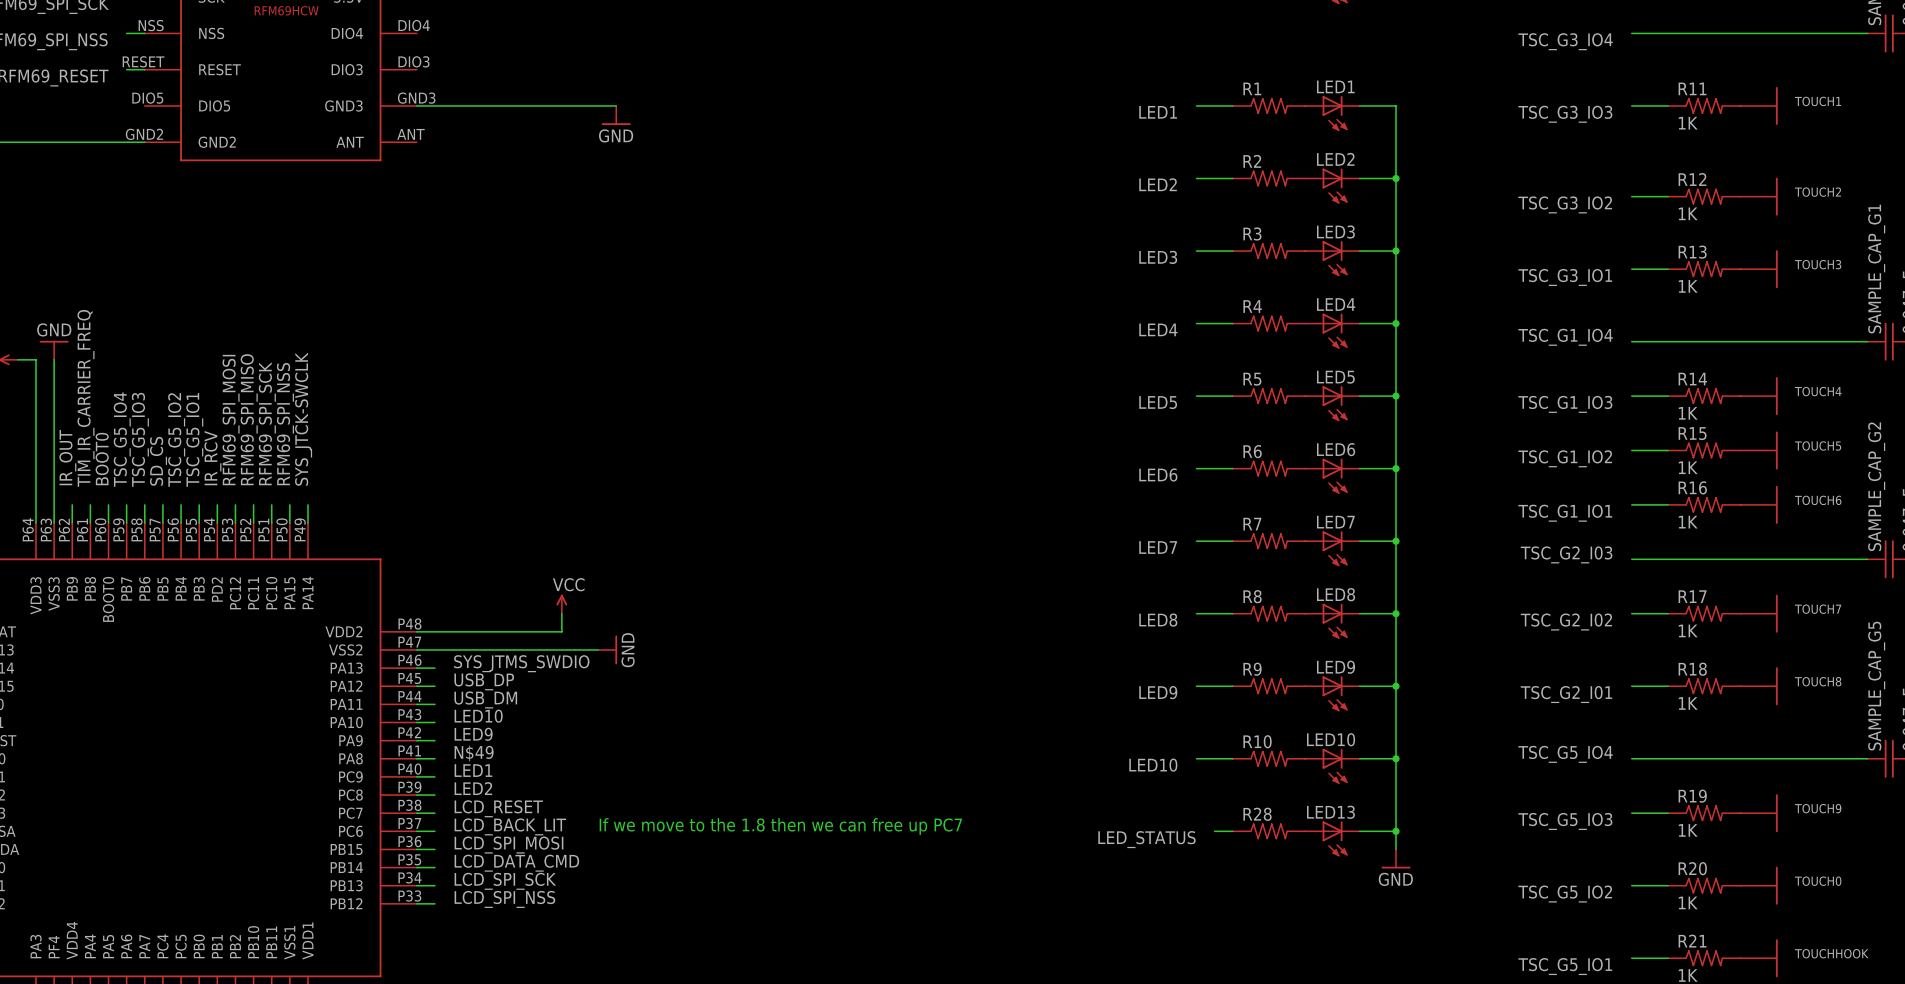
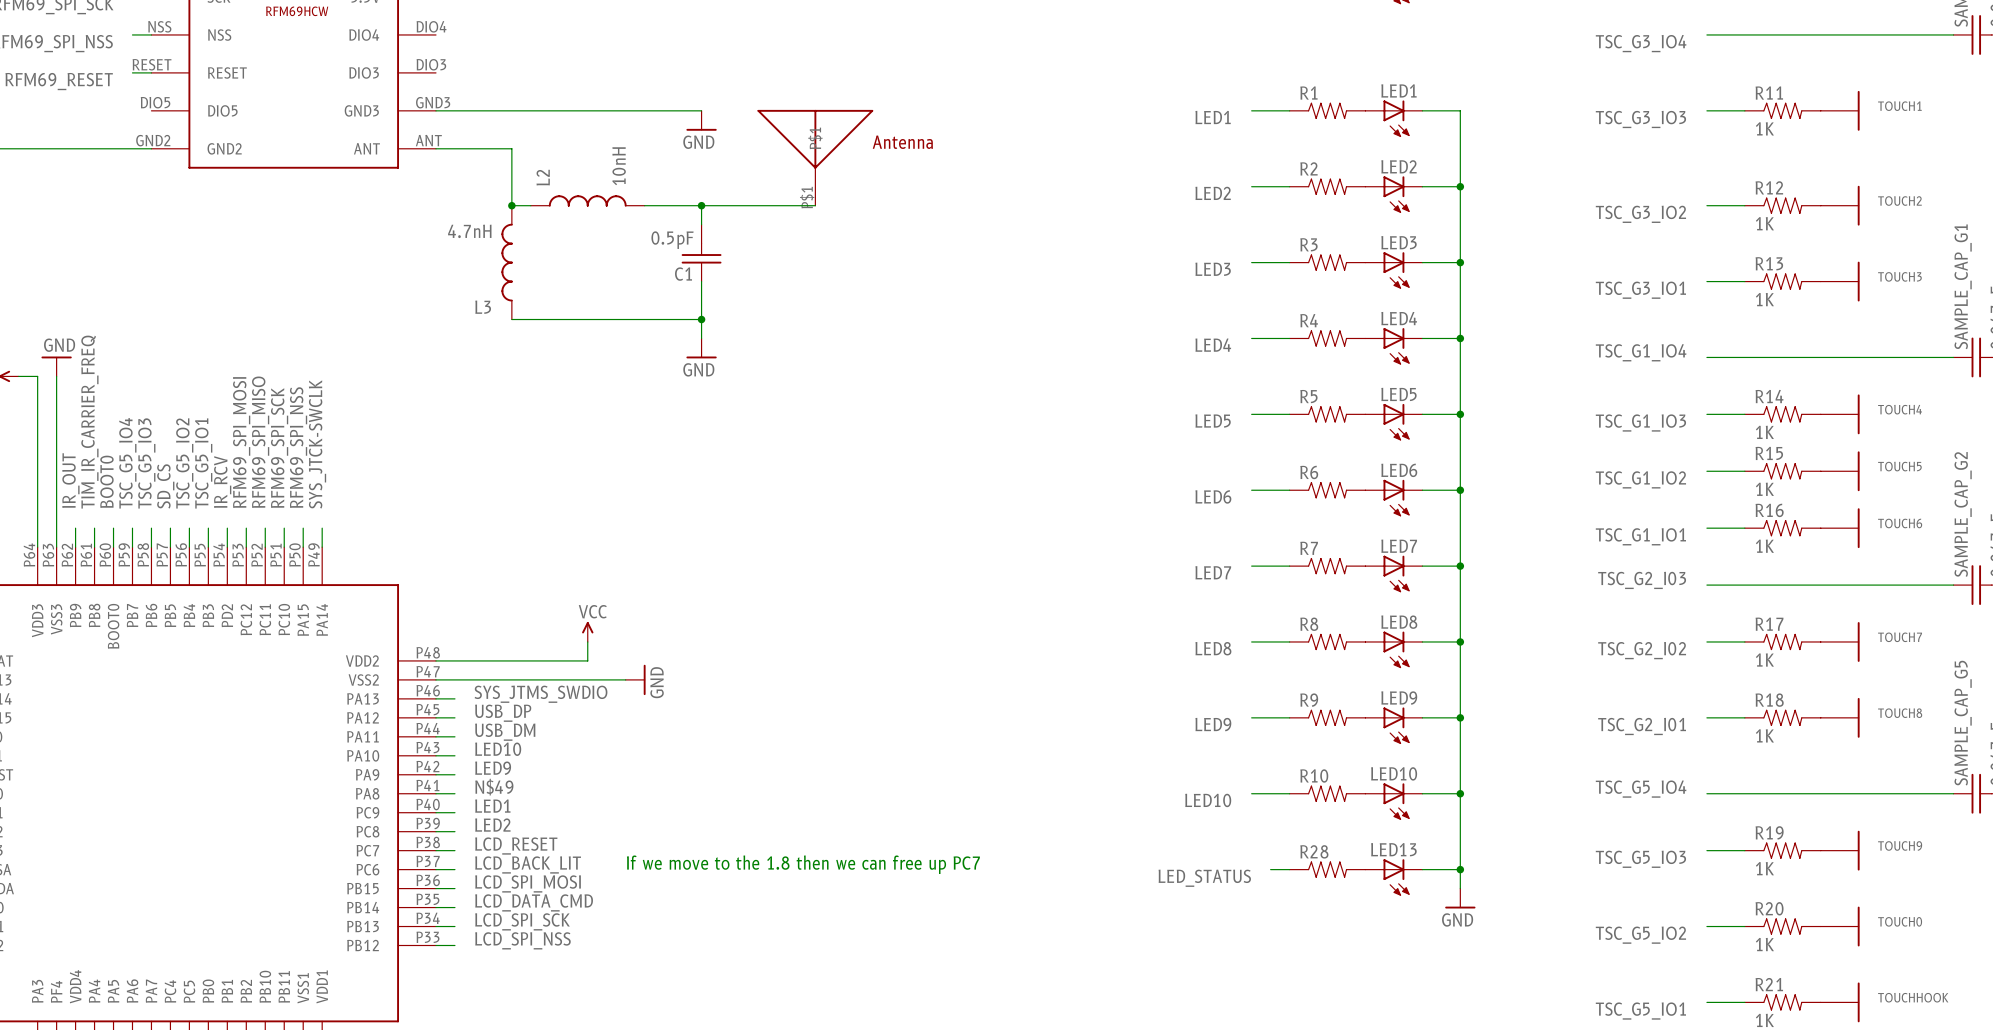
wire: none -> (644, 110) (701, 110)
power symbol position: GND (616, 115) -> GND (701, 120)
wire: none -> (435, 148) (511, 148) (511, 205) (530, 205)
part: none -> (815, 157)
L2: none -> 10nH (587, 200)
junction: none -> (511, 205)
wire: none -> (644, 205) (815, 205)
wire: none -> (701, 205) (701, 224)
junction: none -> (701, 205)
C1: none -> 0.5pF (701, 253)
L3: none -> 4.7nH (507, 262)
wire: none -> (701, 281) (701, 338)
wire: none -> (511, 319) (701, 319)
junction: none -> (701, 319)
power symbol: none -> GND (701, 348)

